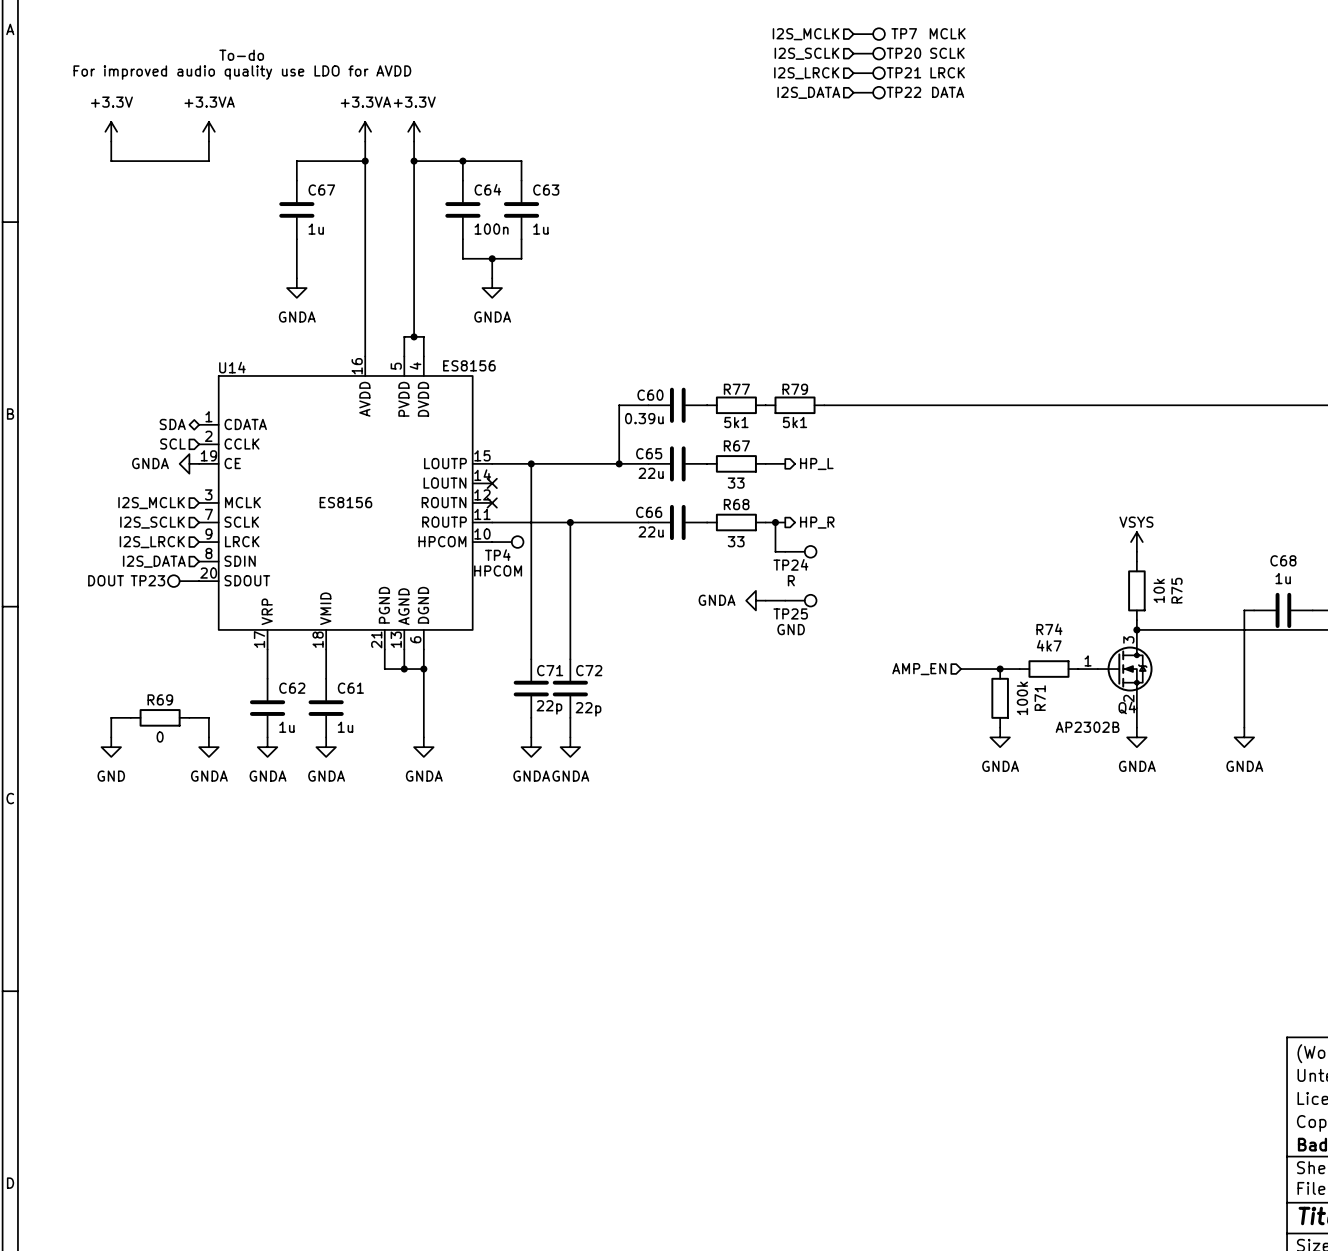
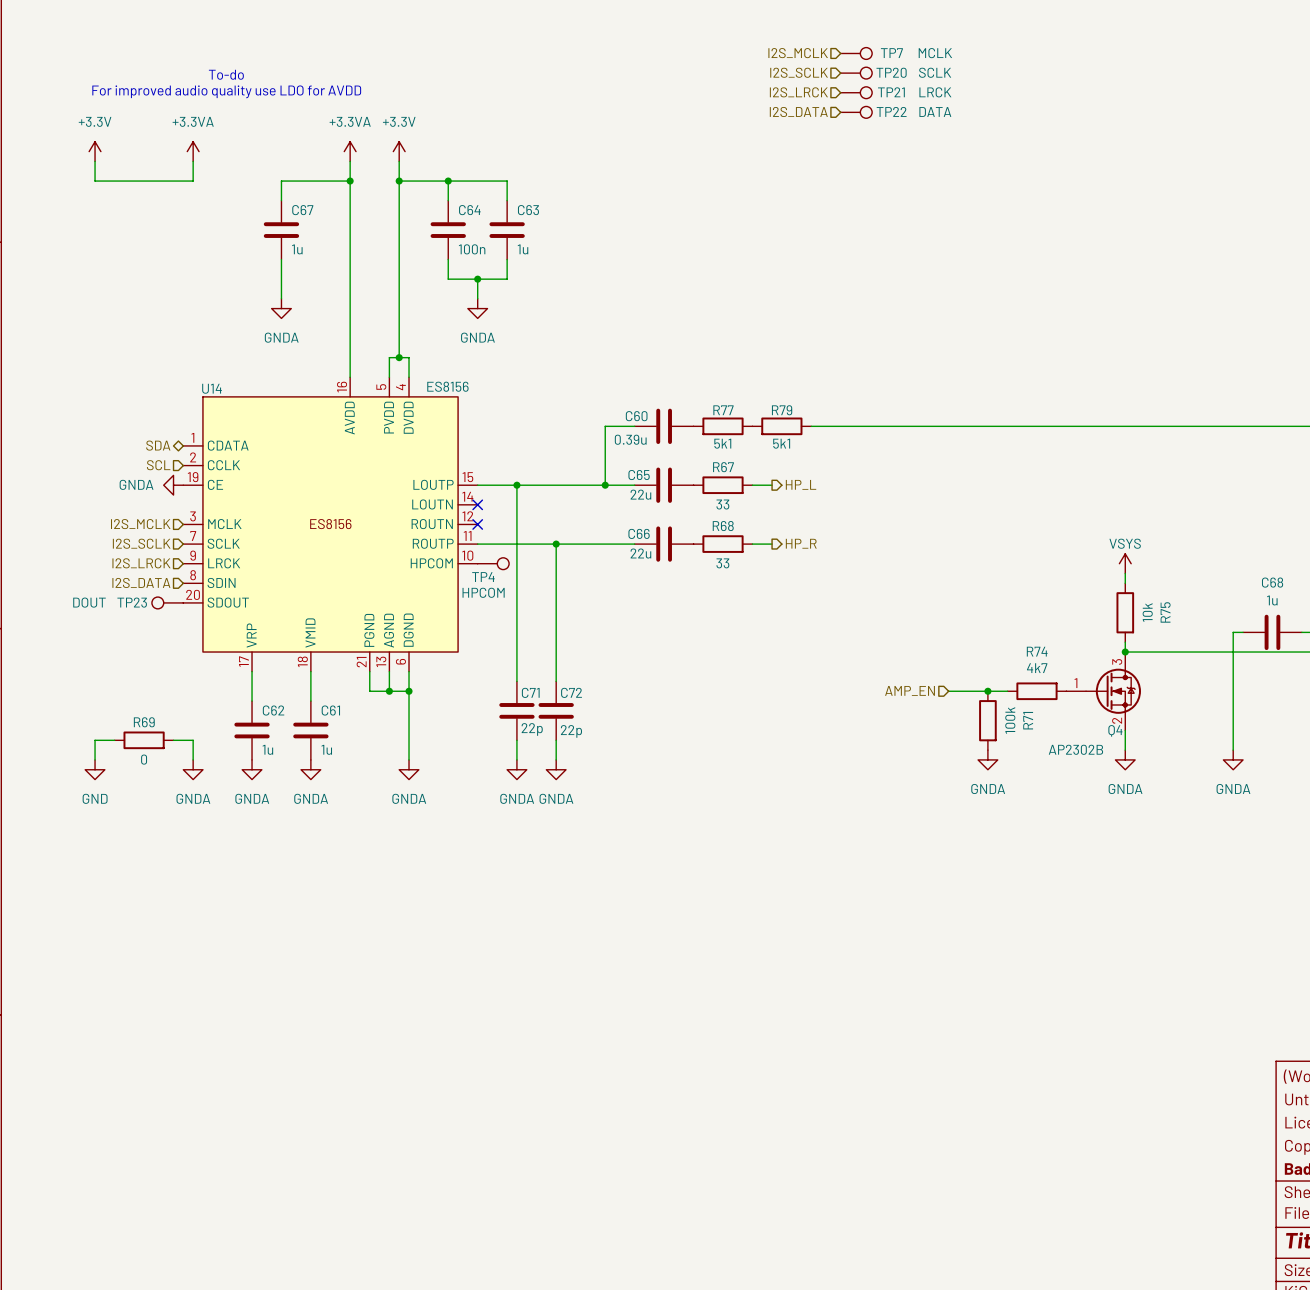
wire: (775, 522) (775, 551) (785, 551) -> none
junction: (775, 522) -> none
TP24: R (800, 551) -> none
power symbol: GNDA (755, 600) -> none
wire: (765, 600) (785, 600) -> none
TP25: GND (800, 600) -> none

